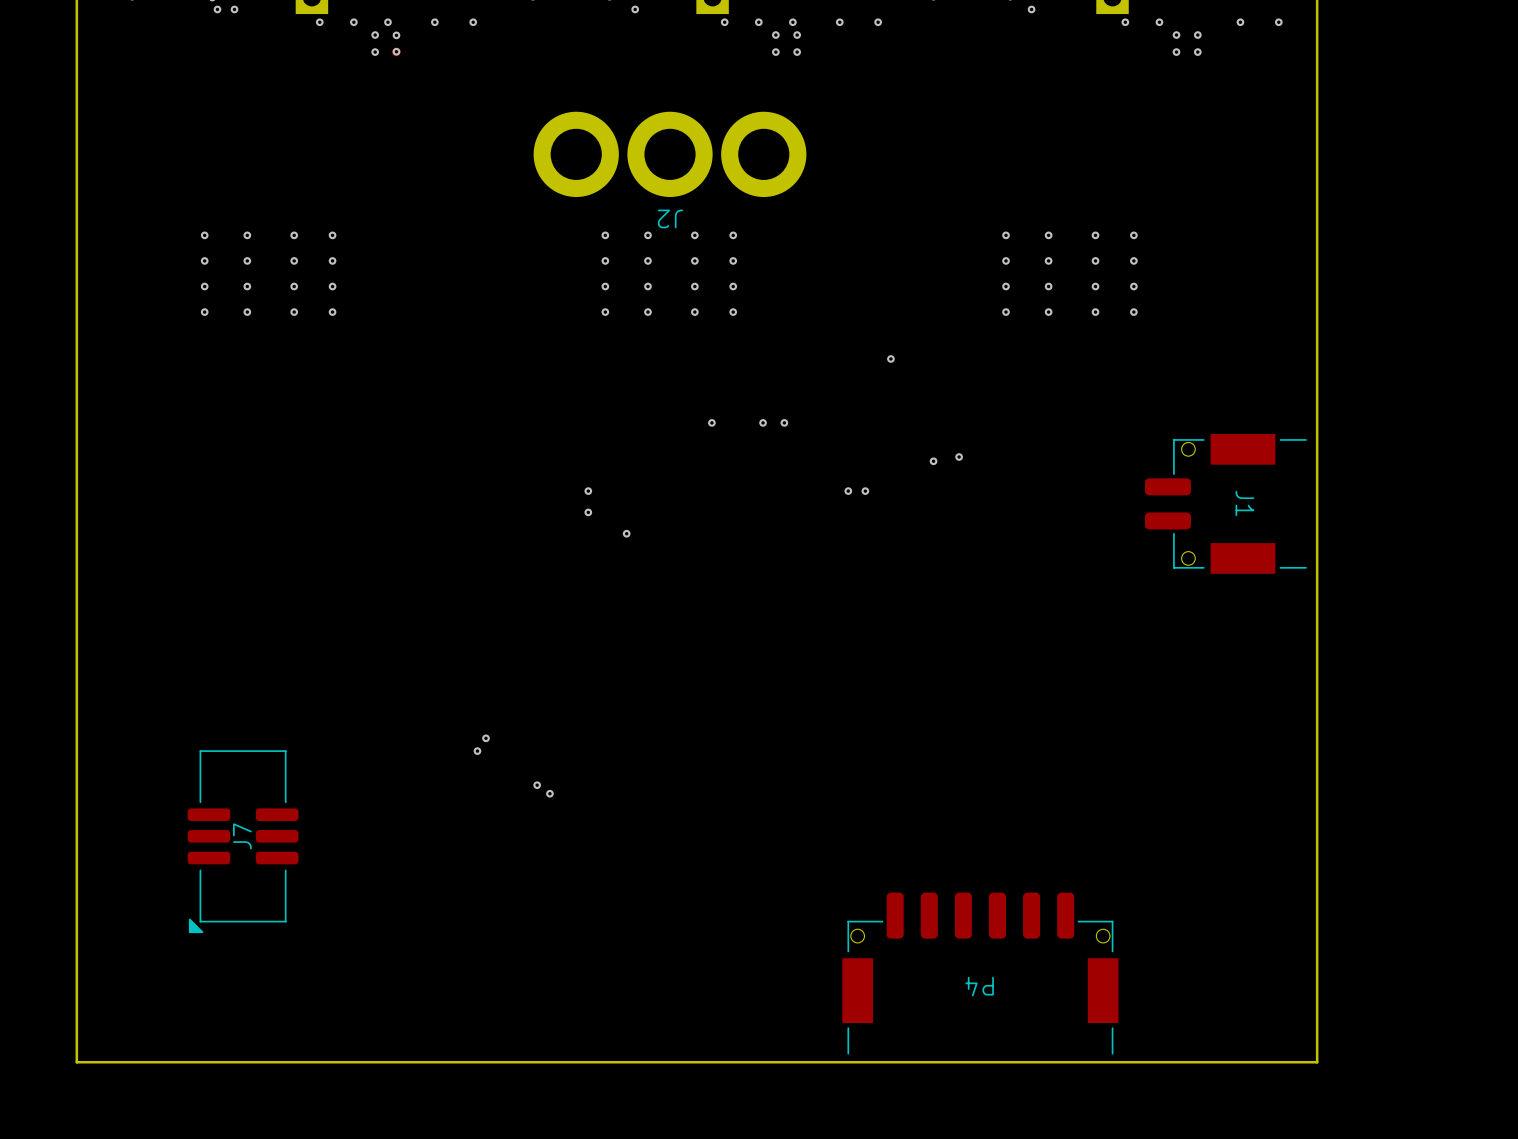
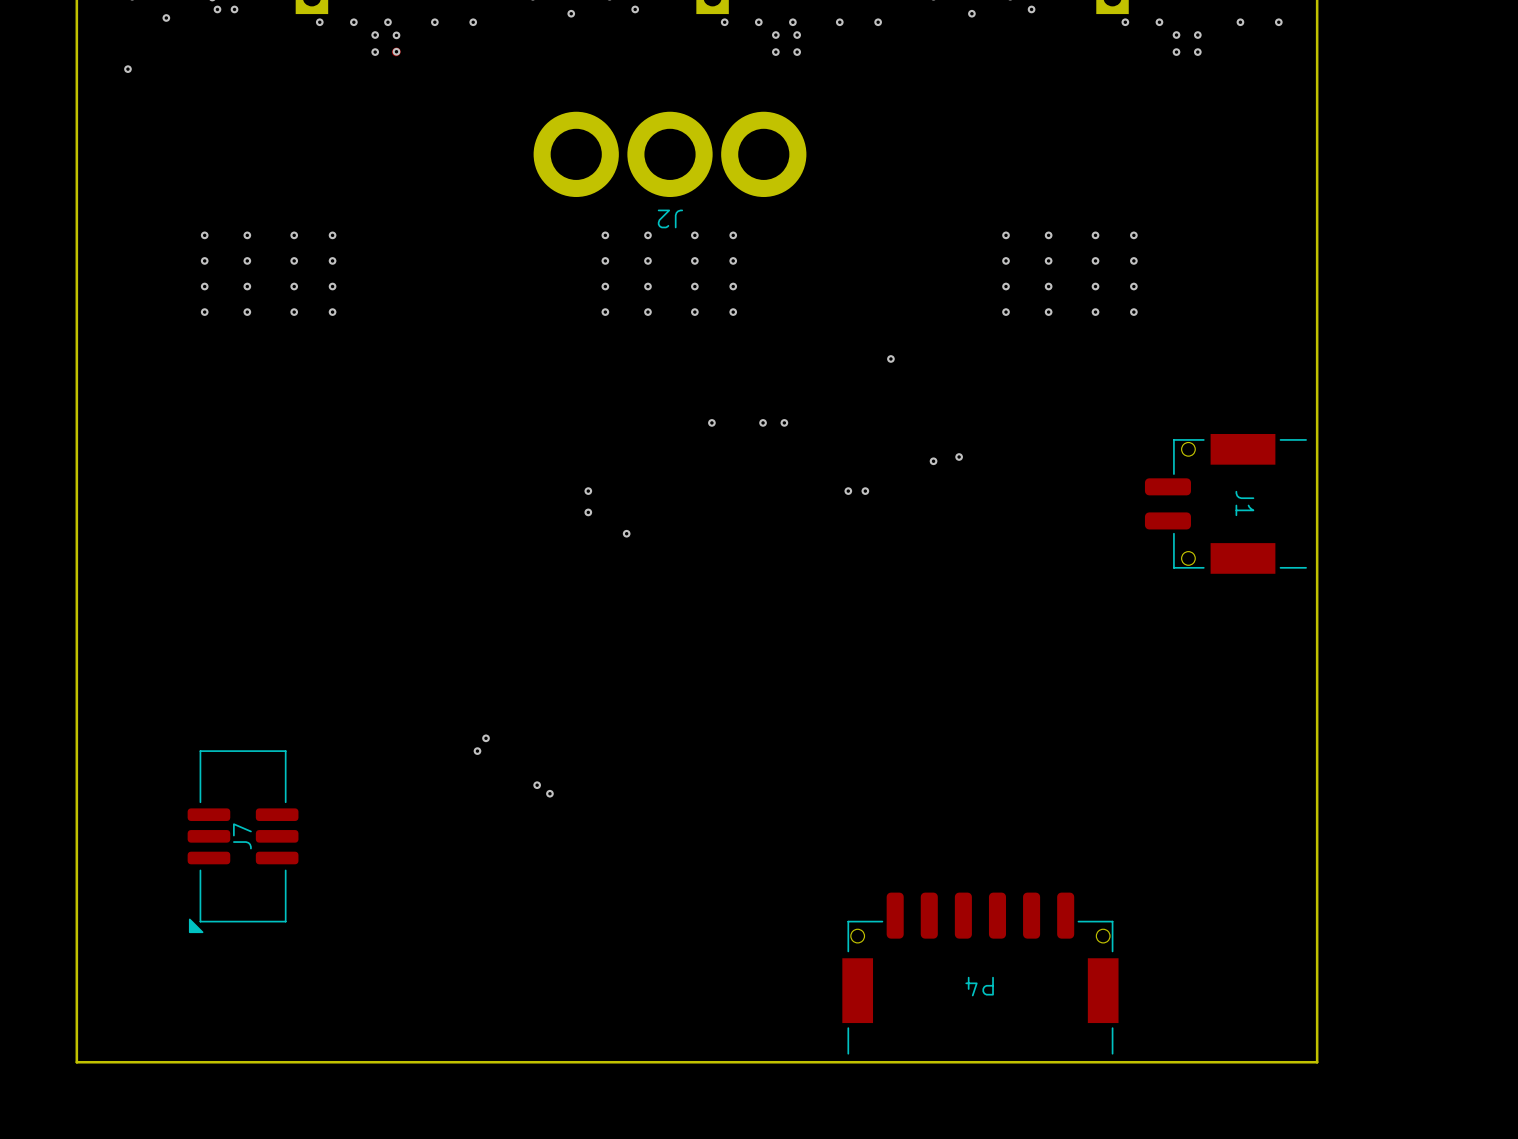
via: none -> (571, 13)
via: none -> (971, 13)
via: none -> (166, 17)
via: none -> (127, 69)

